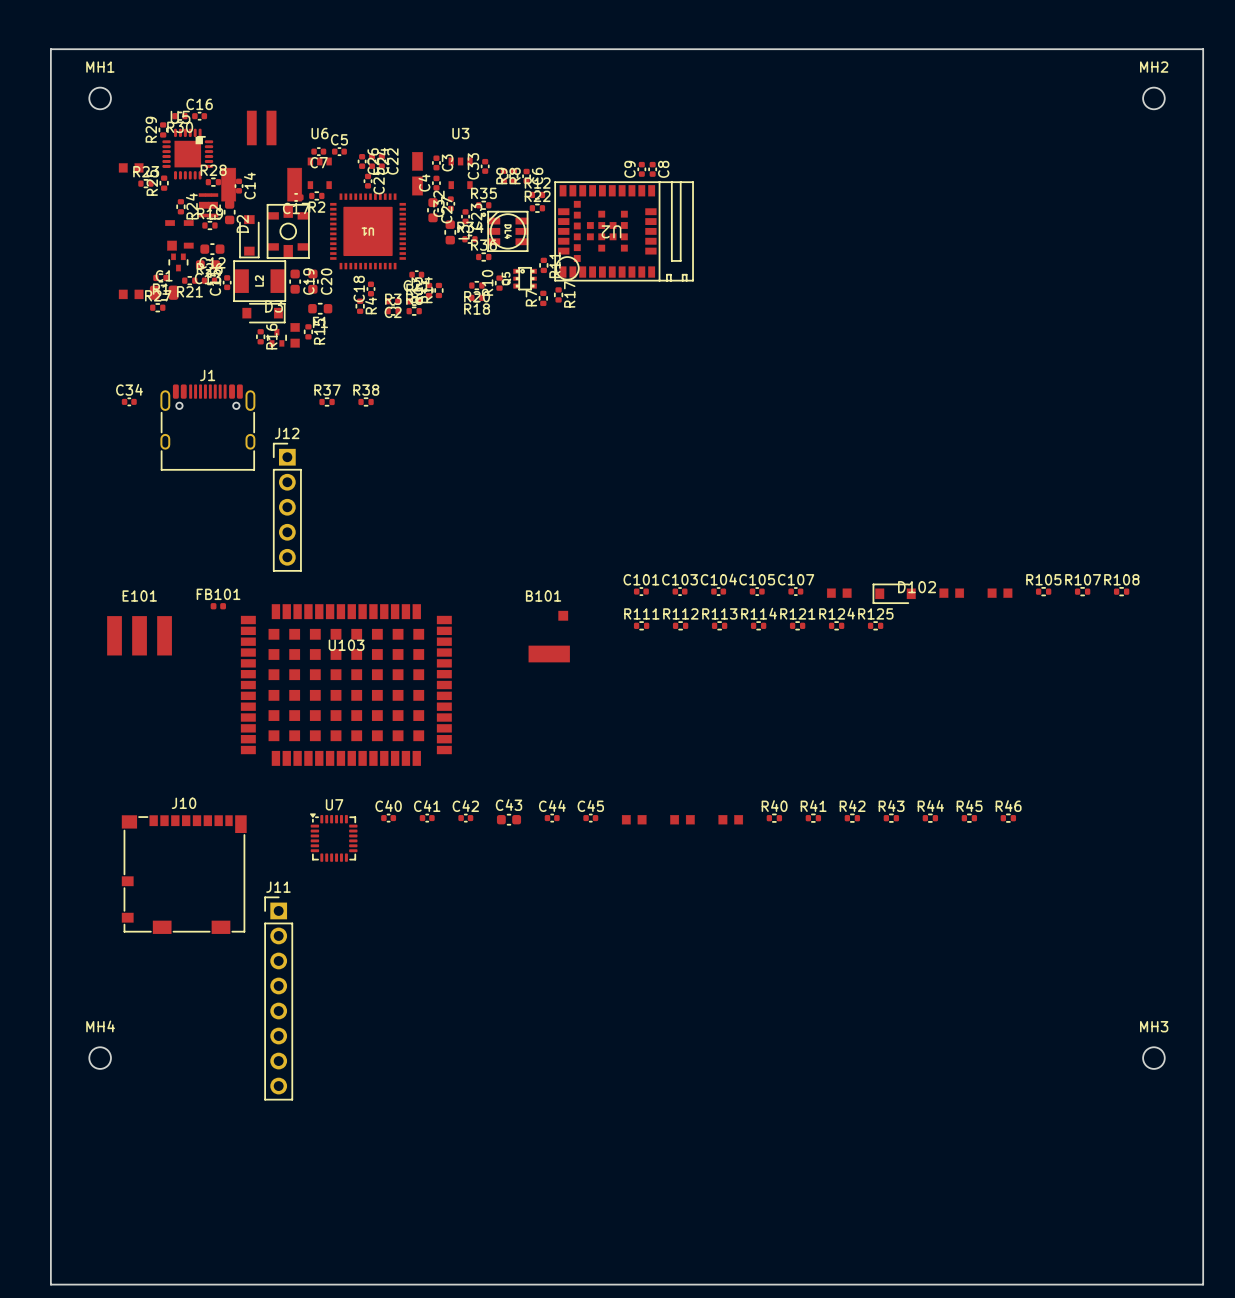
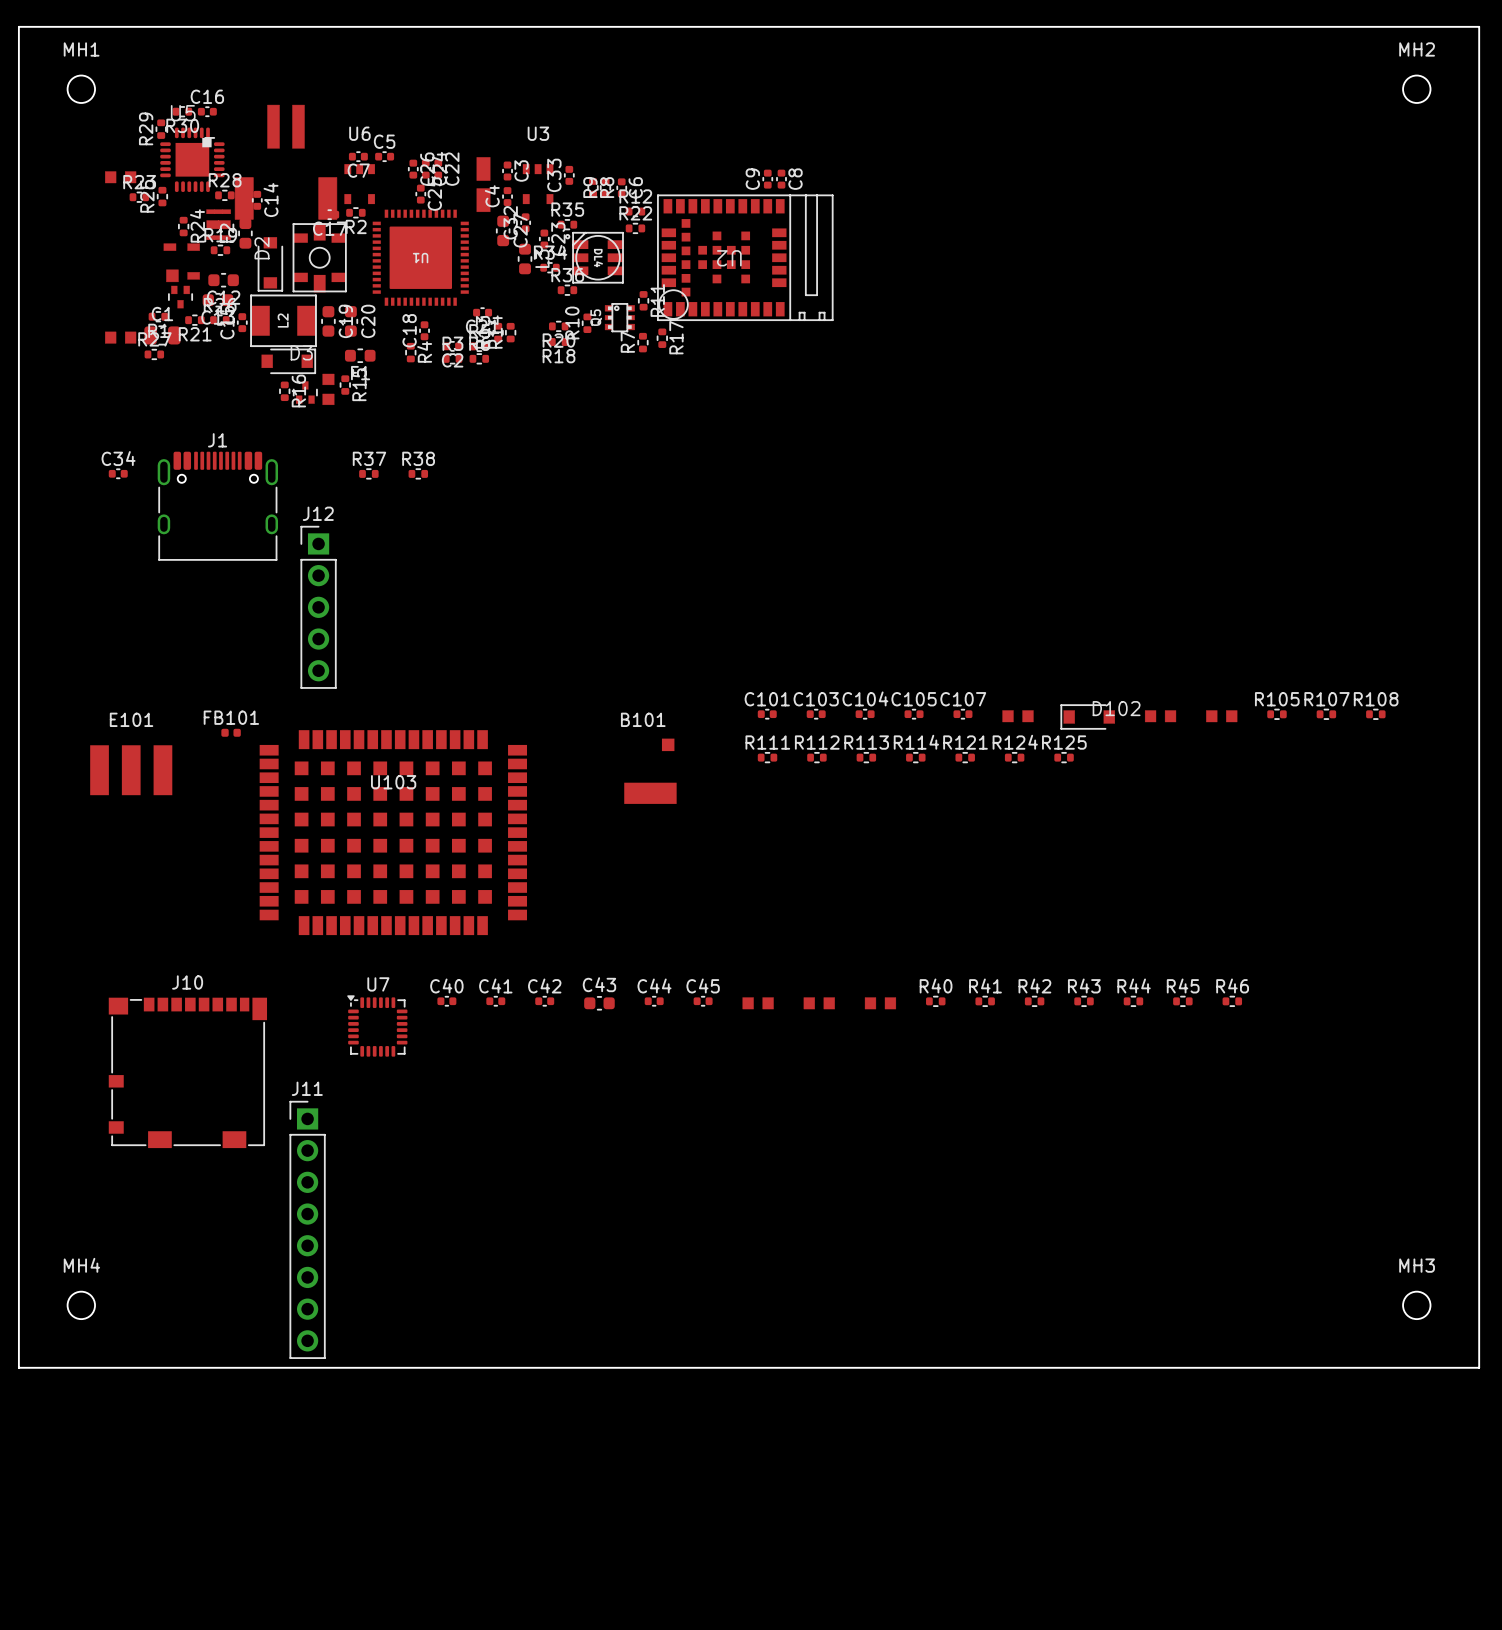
board edge: (50, 1107) (50, 1284) (1203, 1284) (1203, 1107) -> (18, 1367) (1479, 1367)

